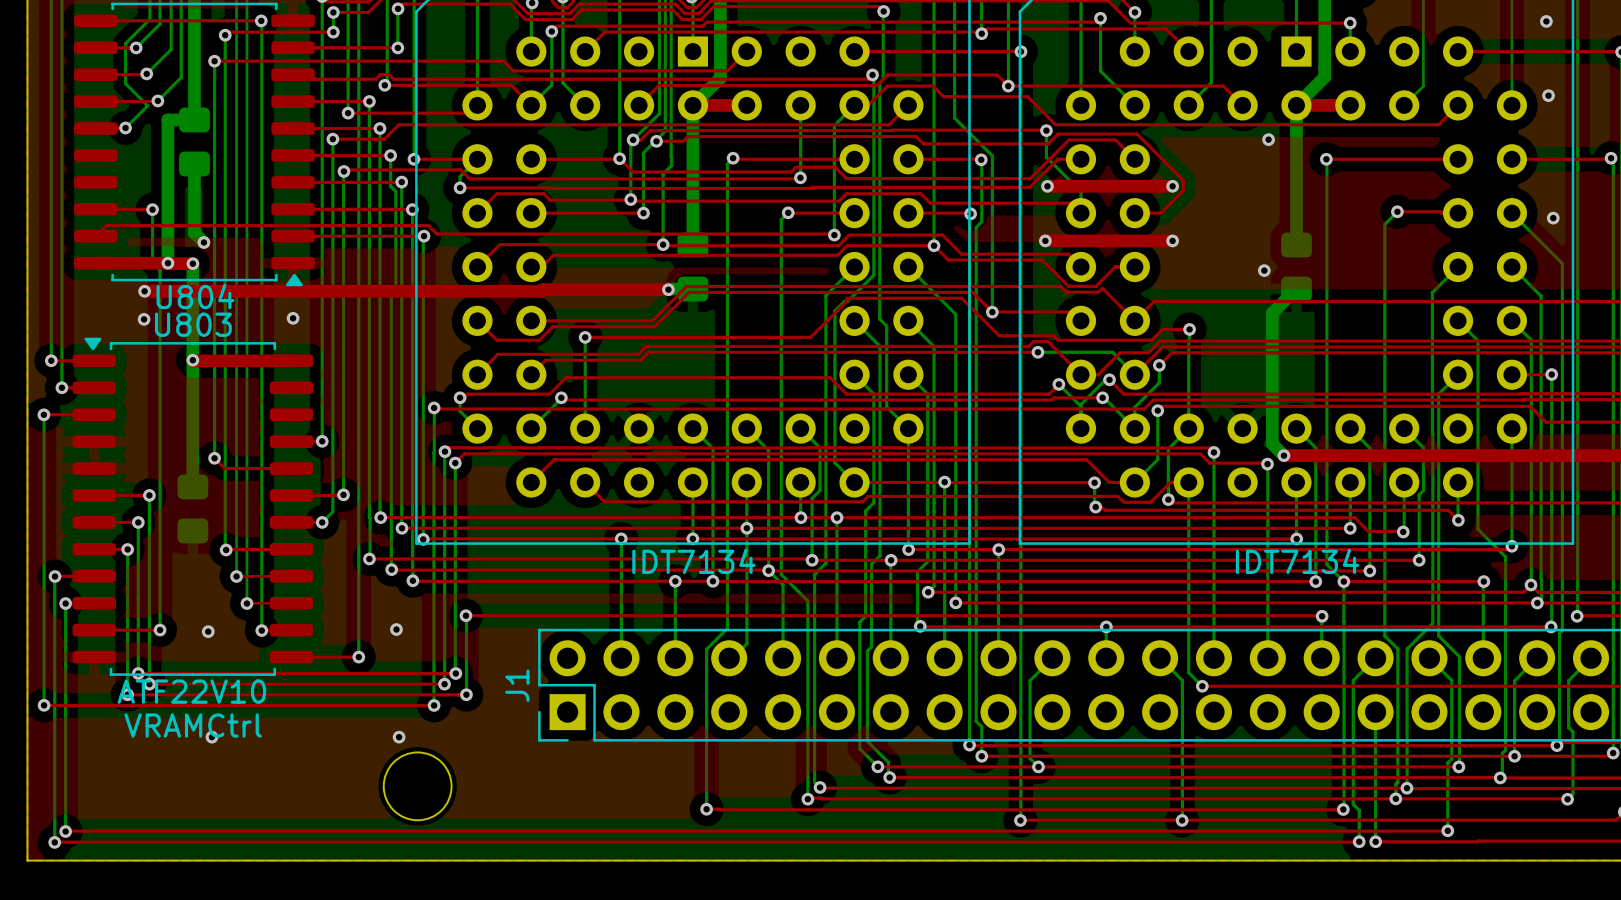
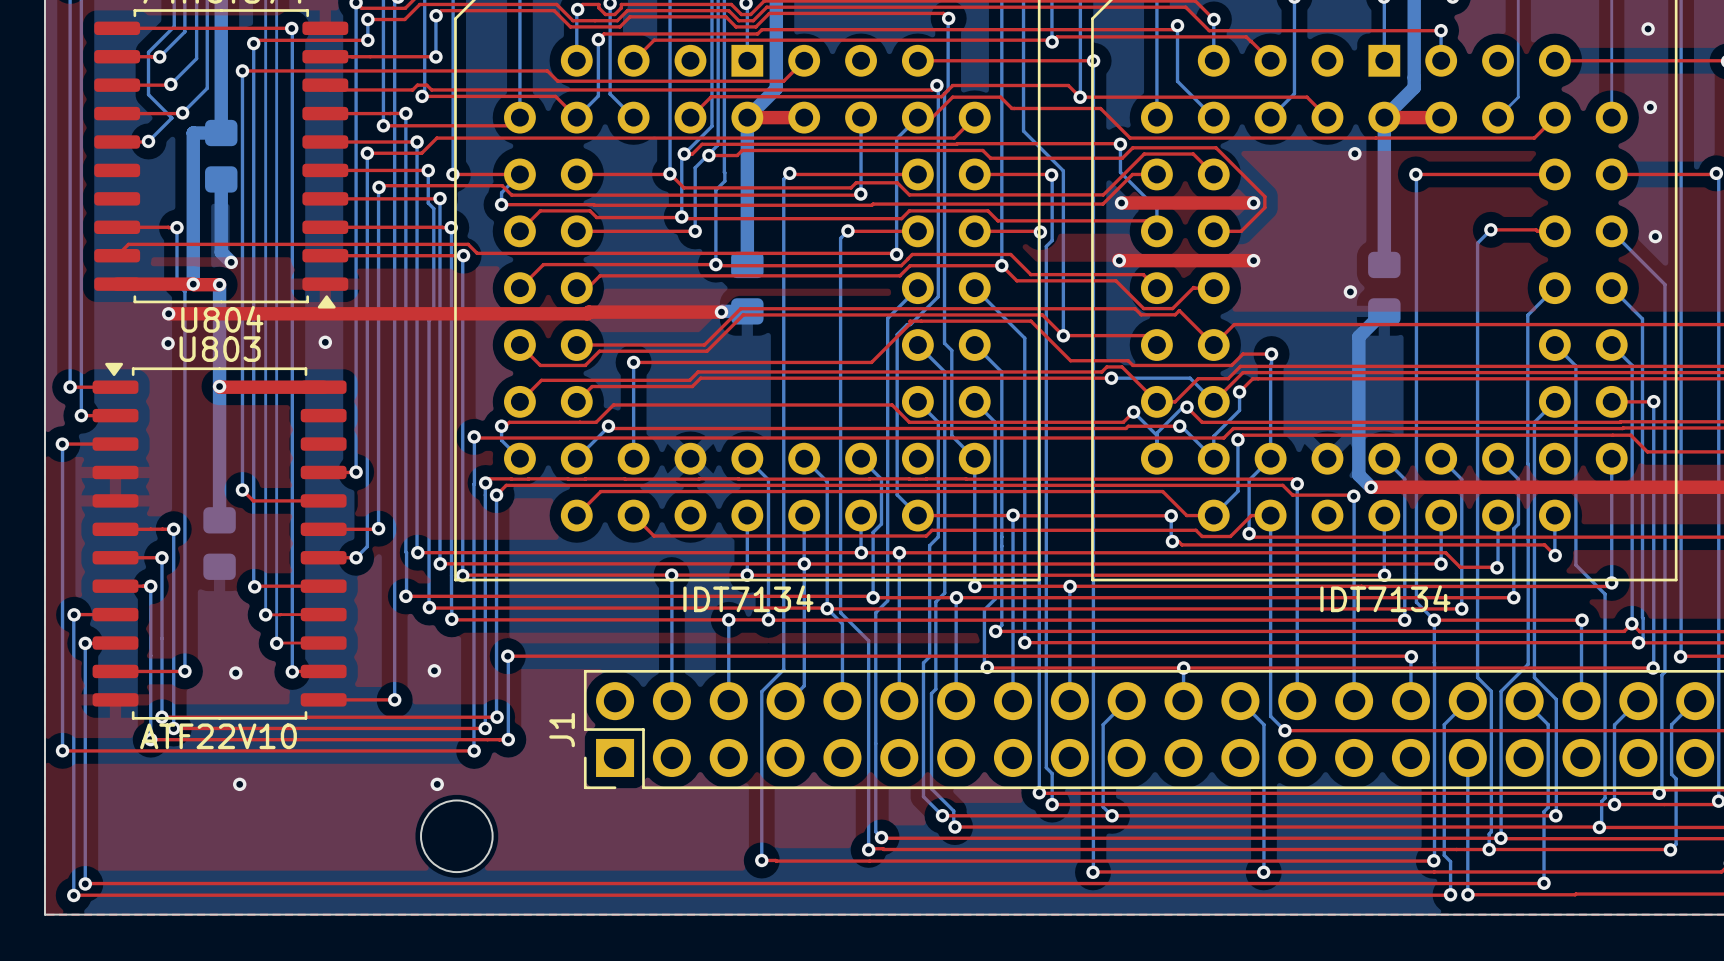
text: VRAMCtrl (193, 725) -> none

